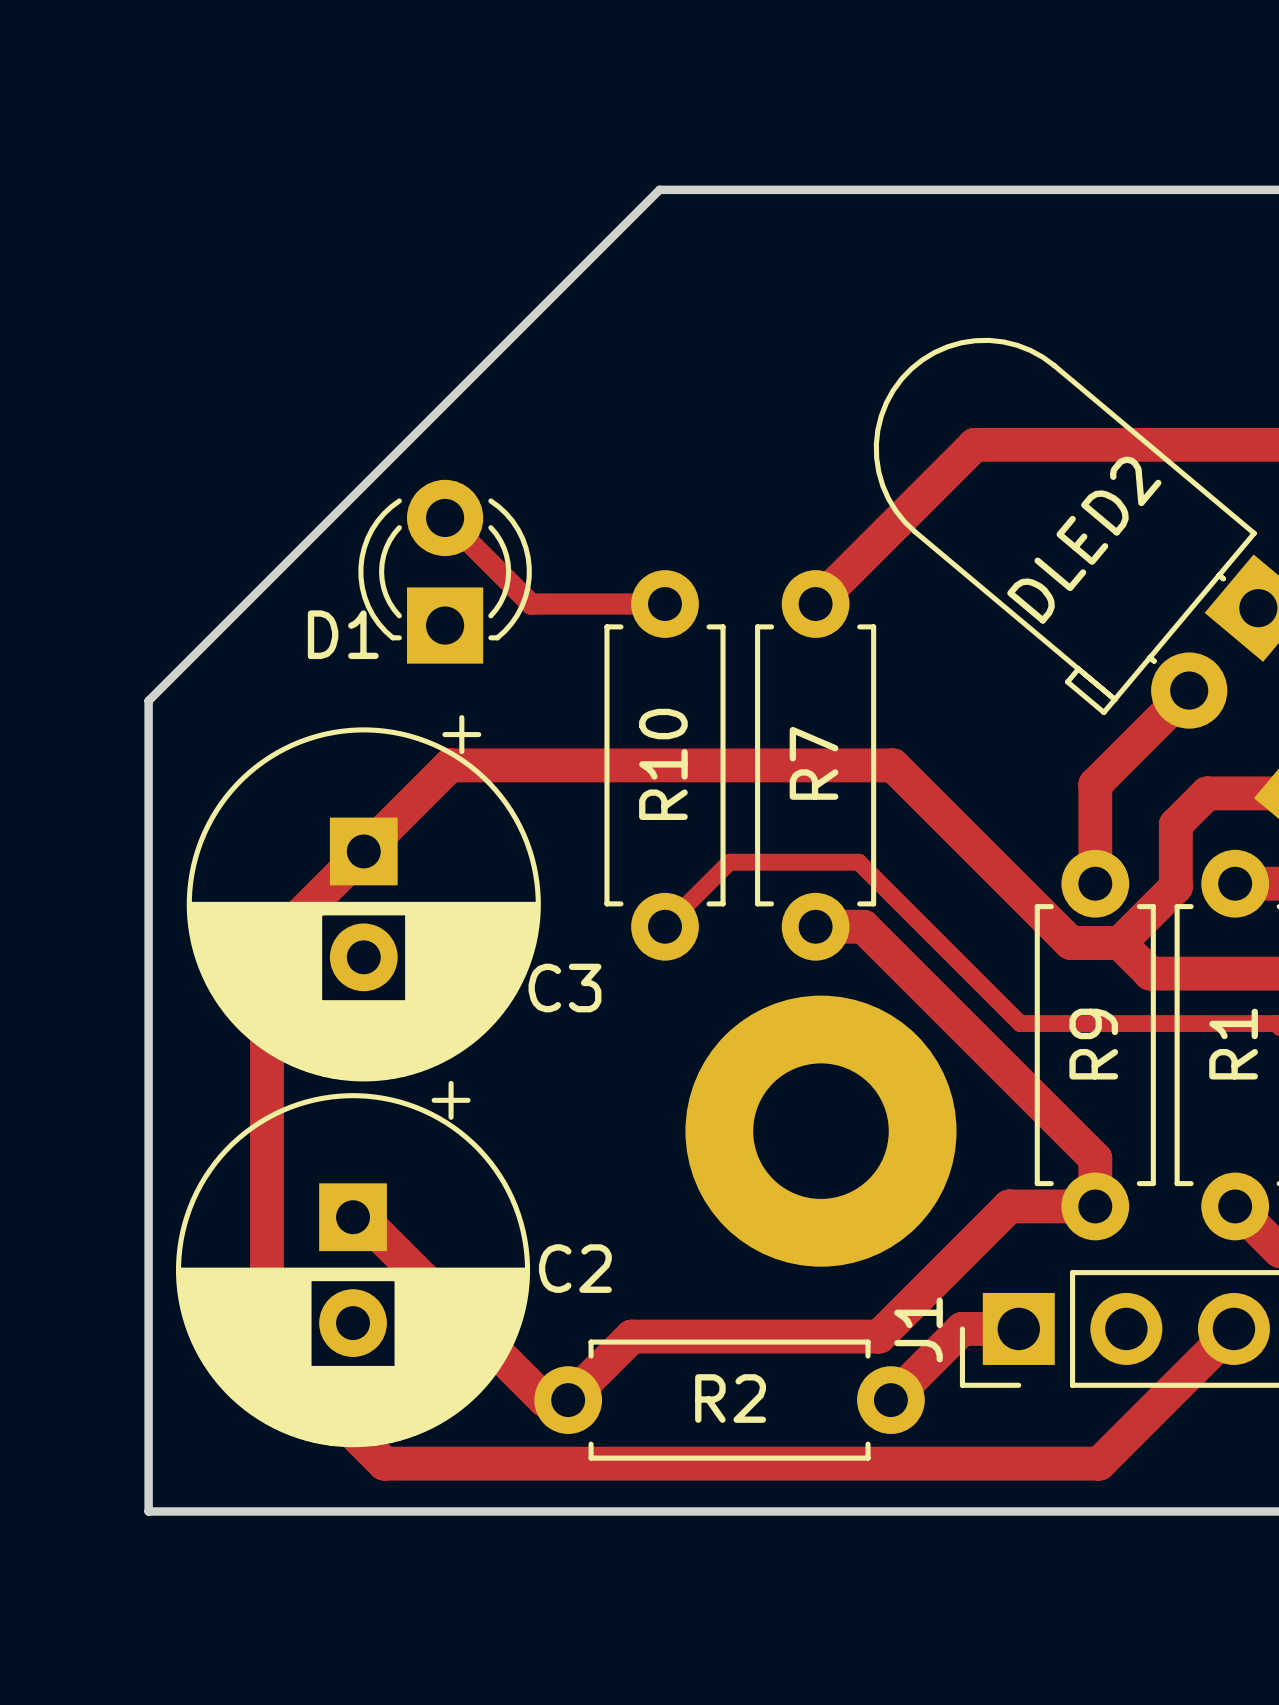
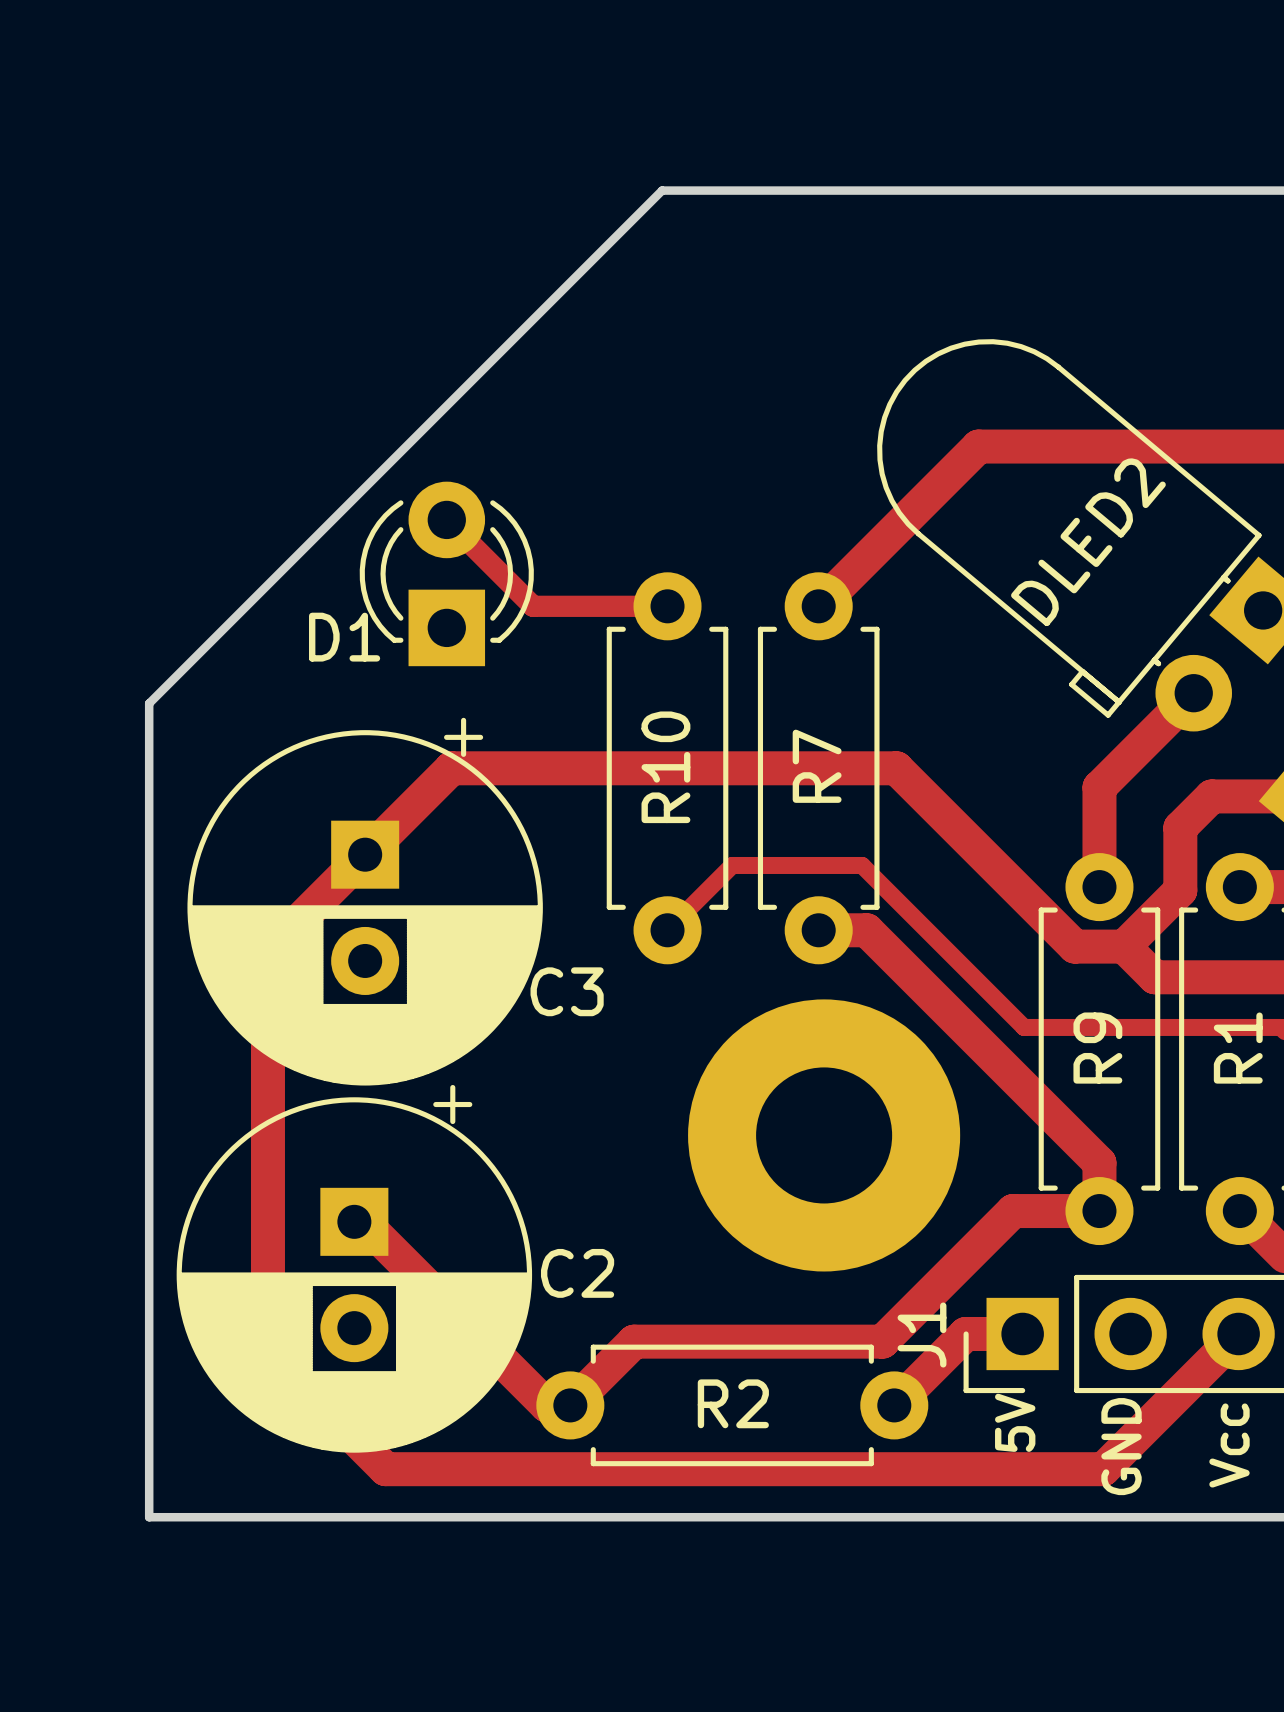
text: none -> 5V (1015, 1422)
text: none -> Vcc (1229, 1445)
text: none -> GND (1121, 1446)

